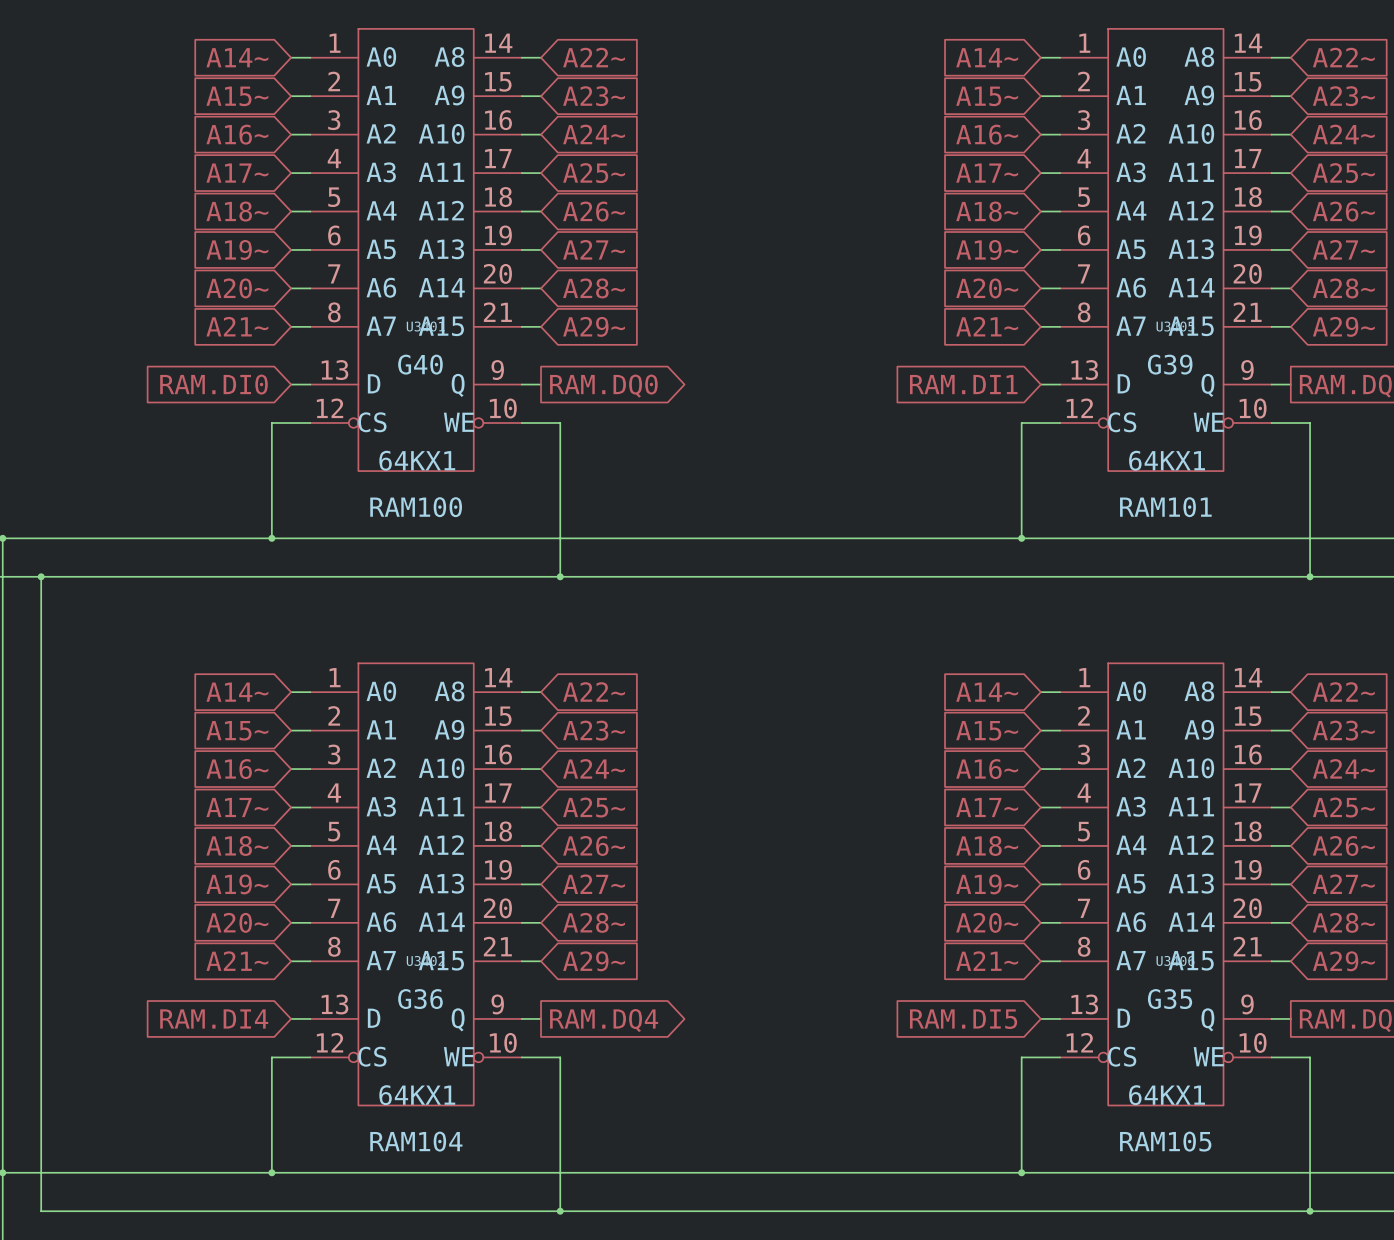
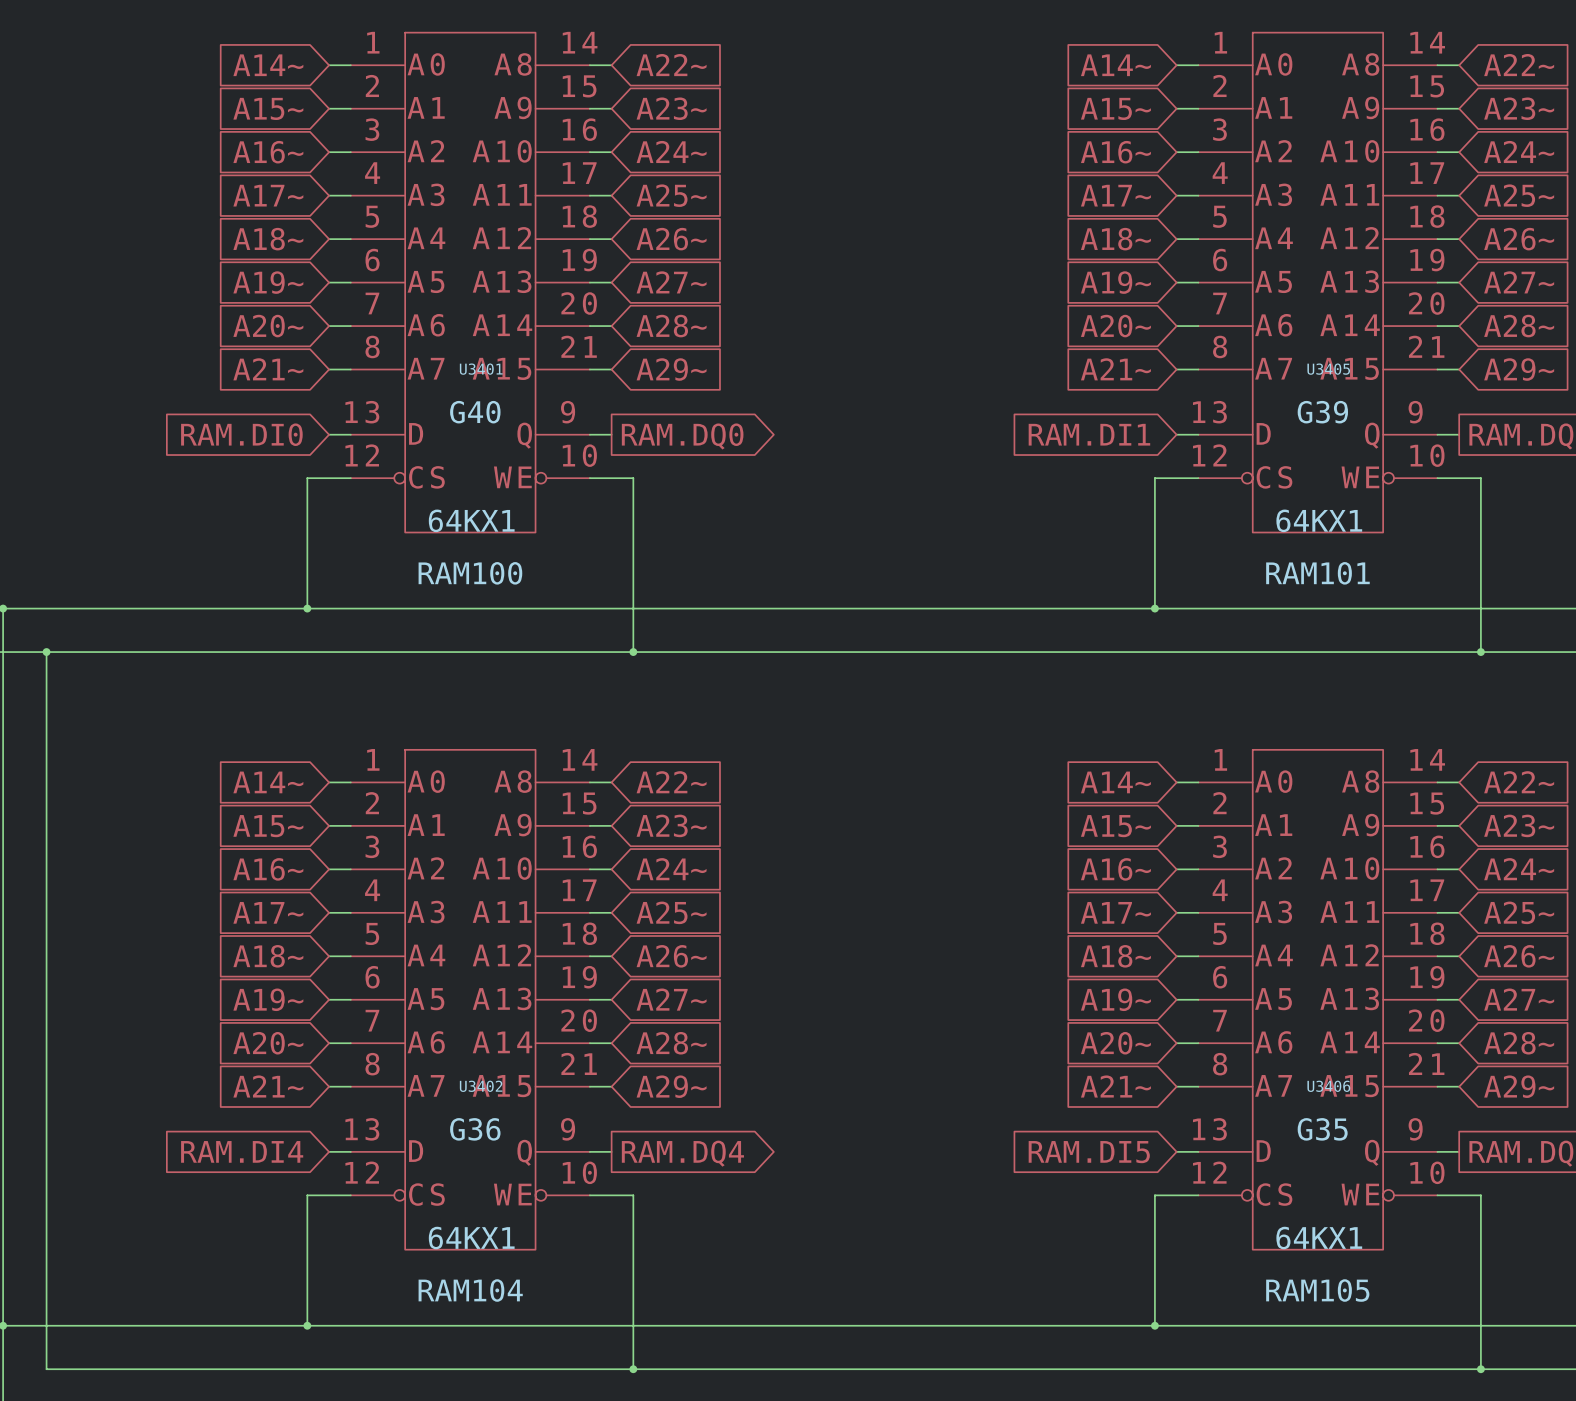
U3401 symbol: [310, 28, 522, 472] -> [350, 32, 590, 533]
U3405 symbol: [1060, 28, 1272, 472] -> [1198, 32, 1438, 533]
U3402 symbol: [310, 663, 522, 1106] -> [350, 749, 590, 1250]
U3406 symbol: [1060, 663, 1272, 1106] -> [1198, 749, 1438, 1250]

